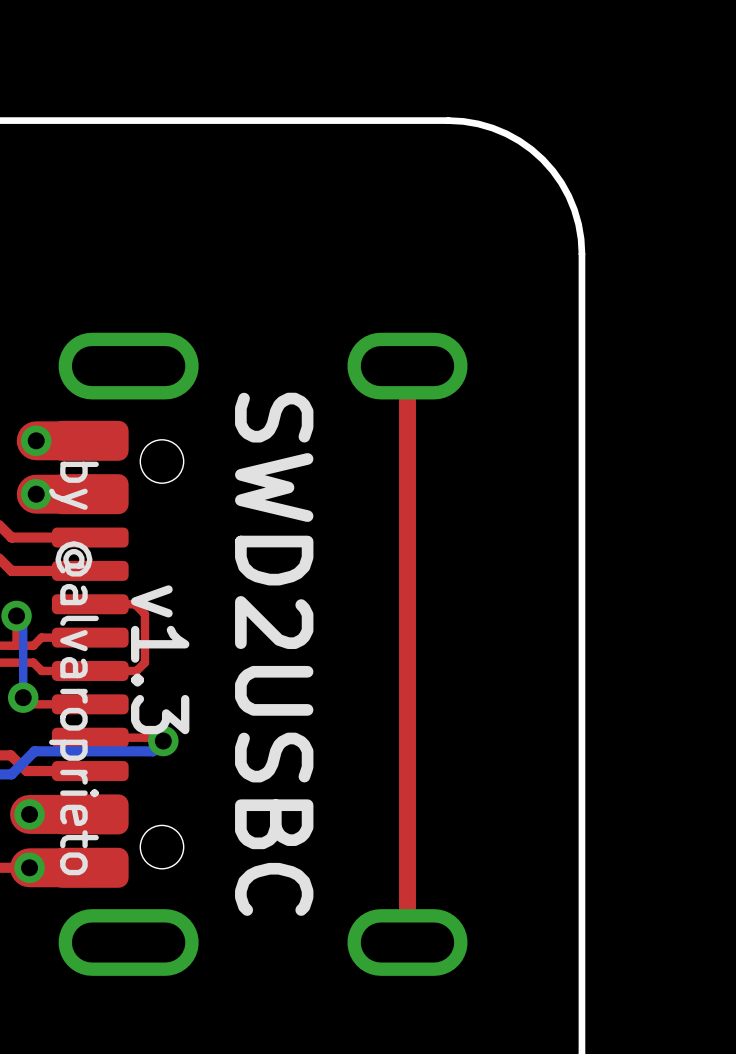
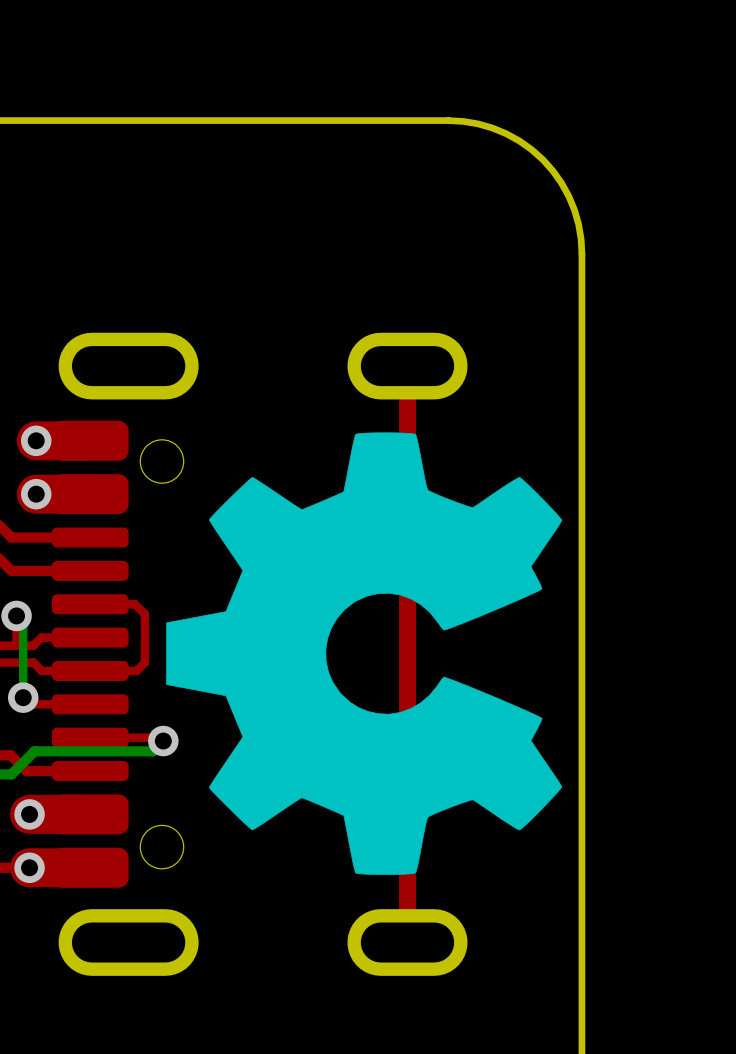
drawing: none -> [166, 432, 563, 875]
text: SWD2USBC (274, 654) -> none
text: v1.3 (160, 659) -> none
text: by @alvaroprieto (73, 668) -> none

